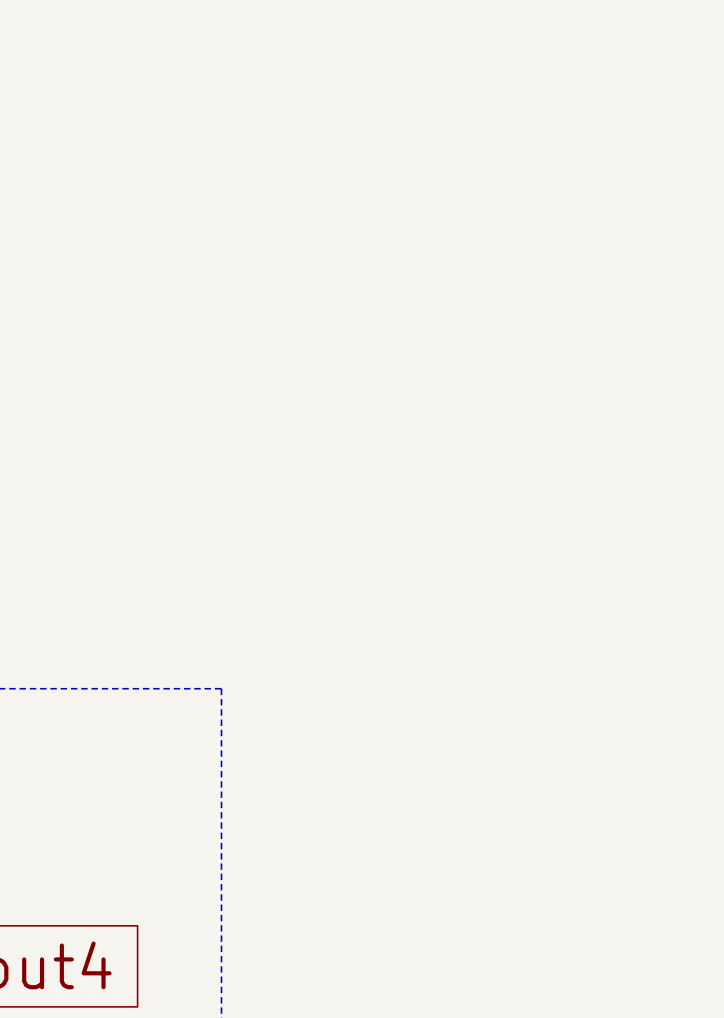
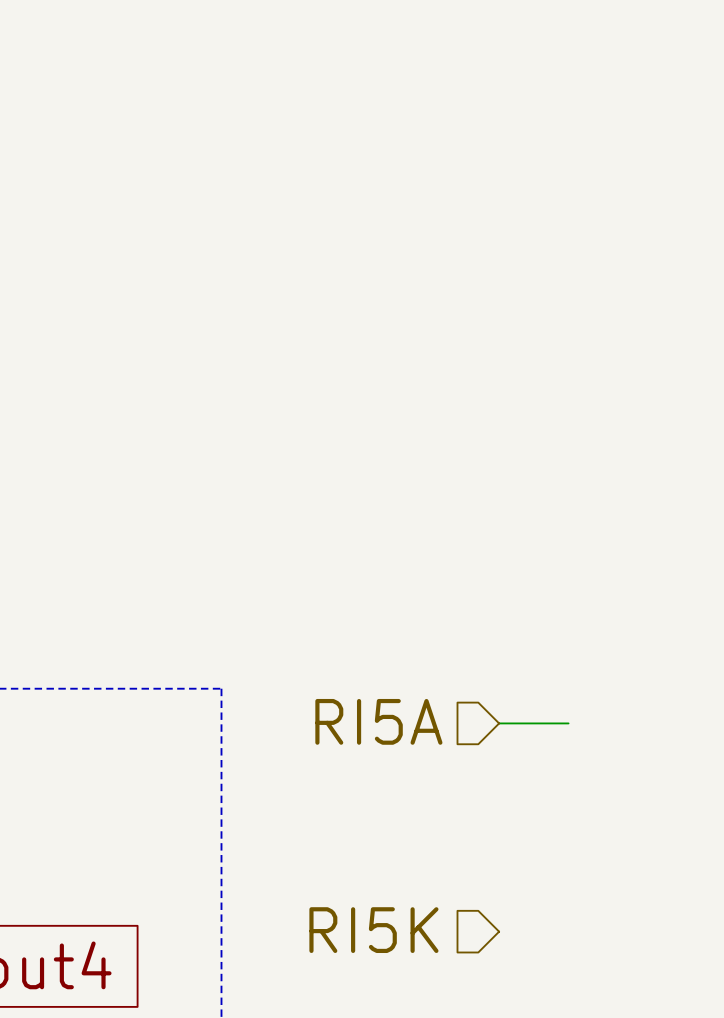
hierarchical label: none -> RI5A (378, 721)
wire: none -> (499, 723) (568, 723)
hierarchical label: none -> RI5K (373, 930)

